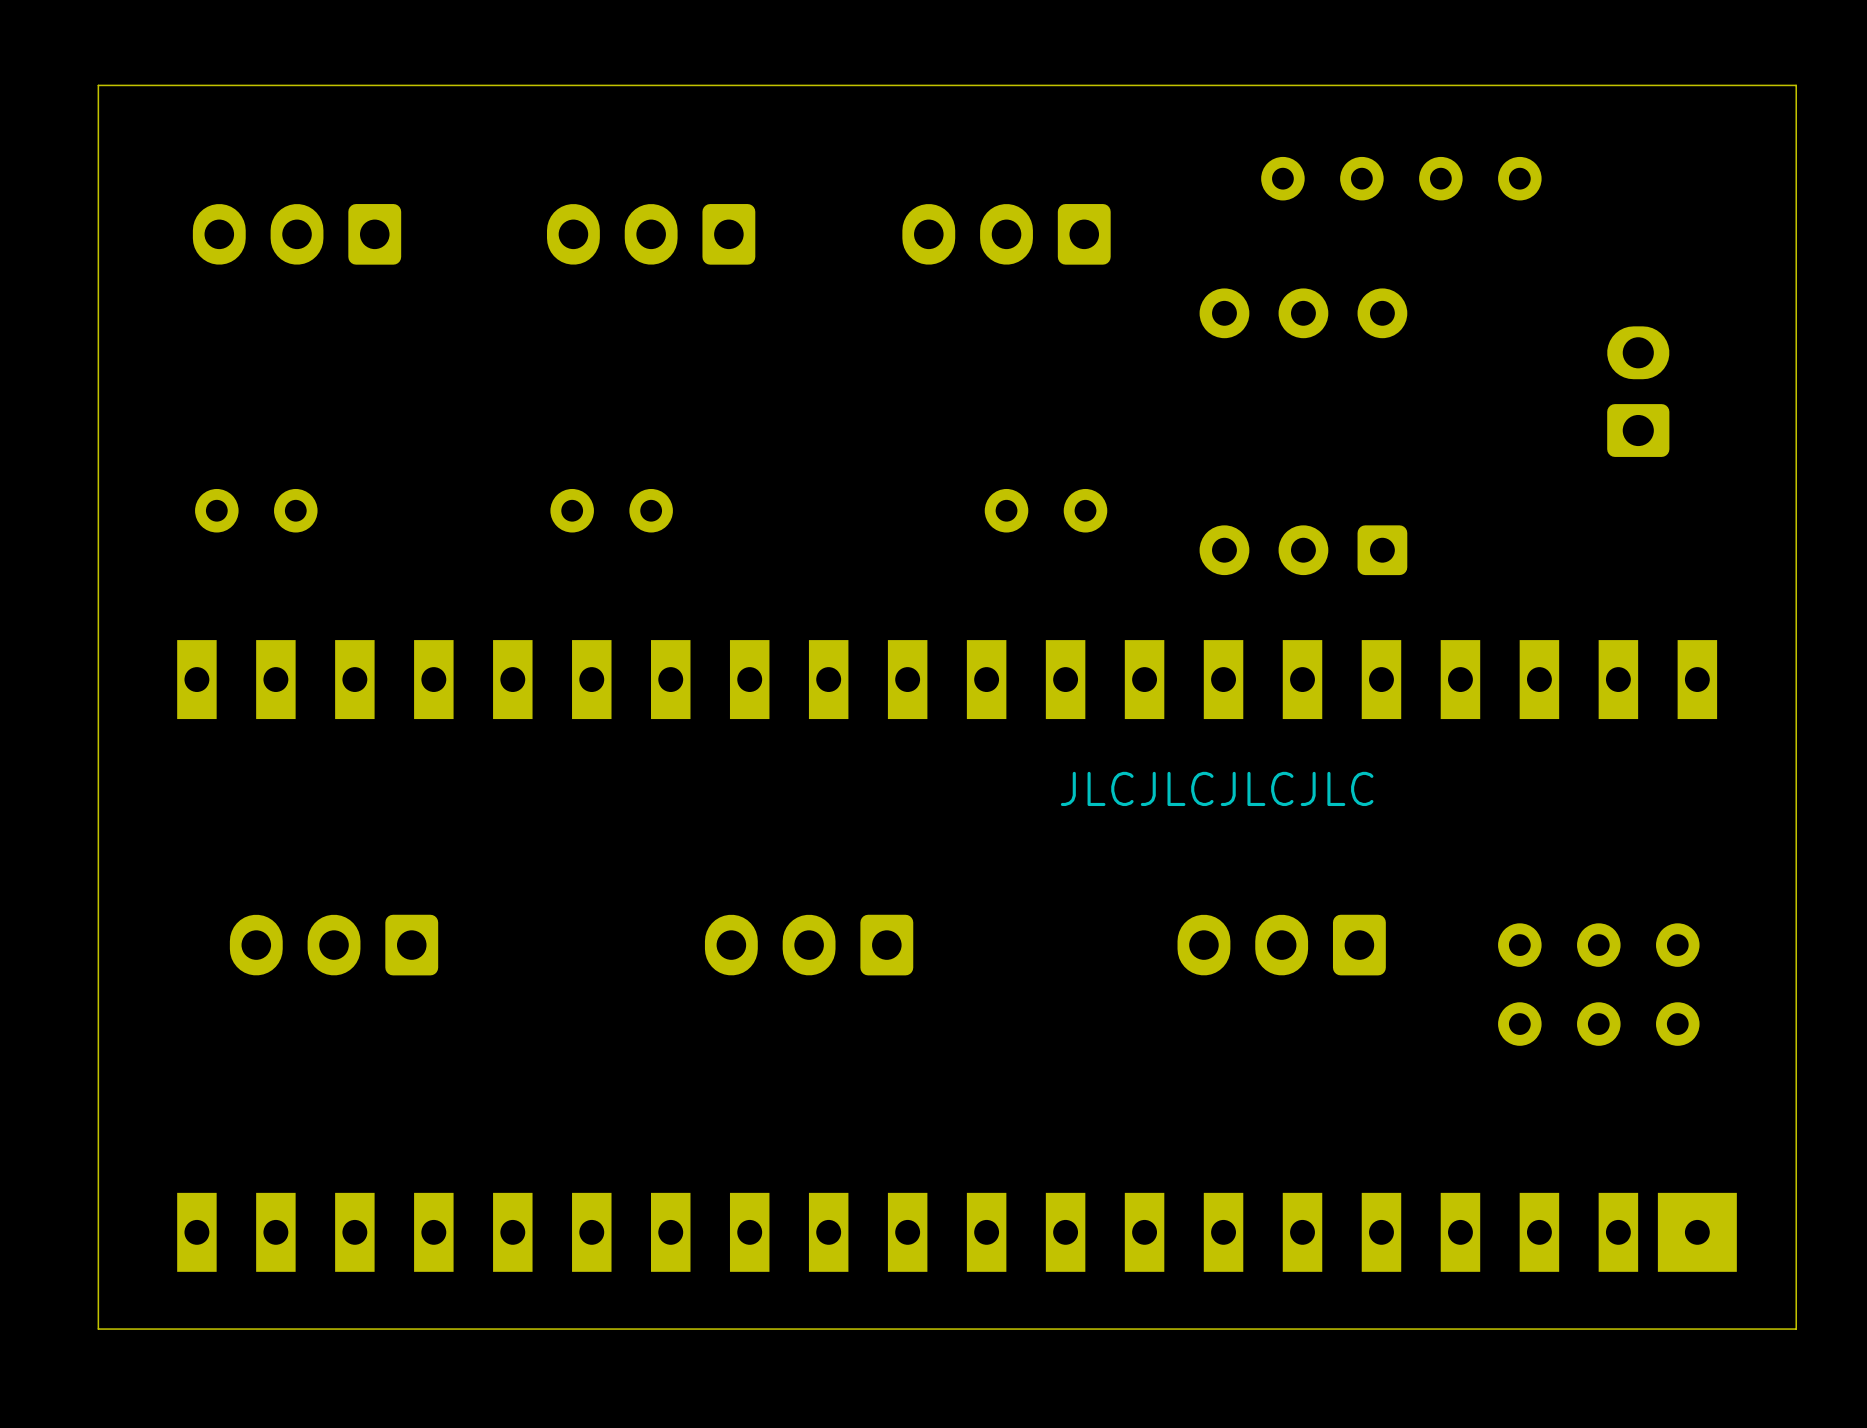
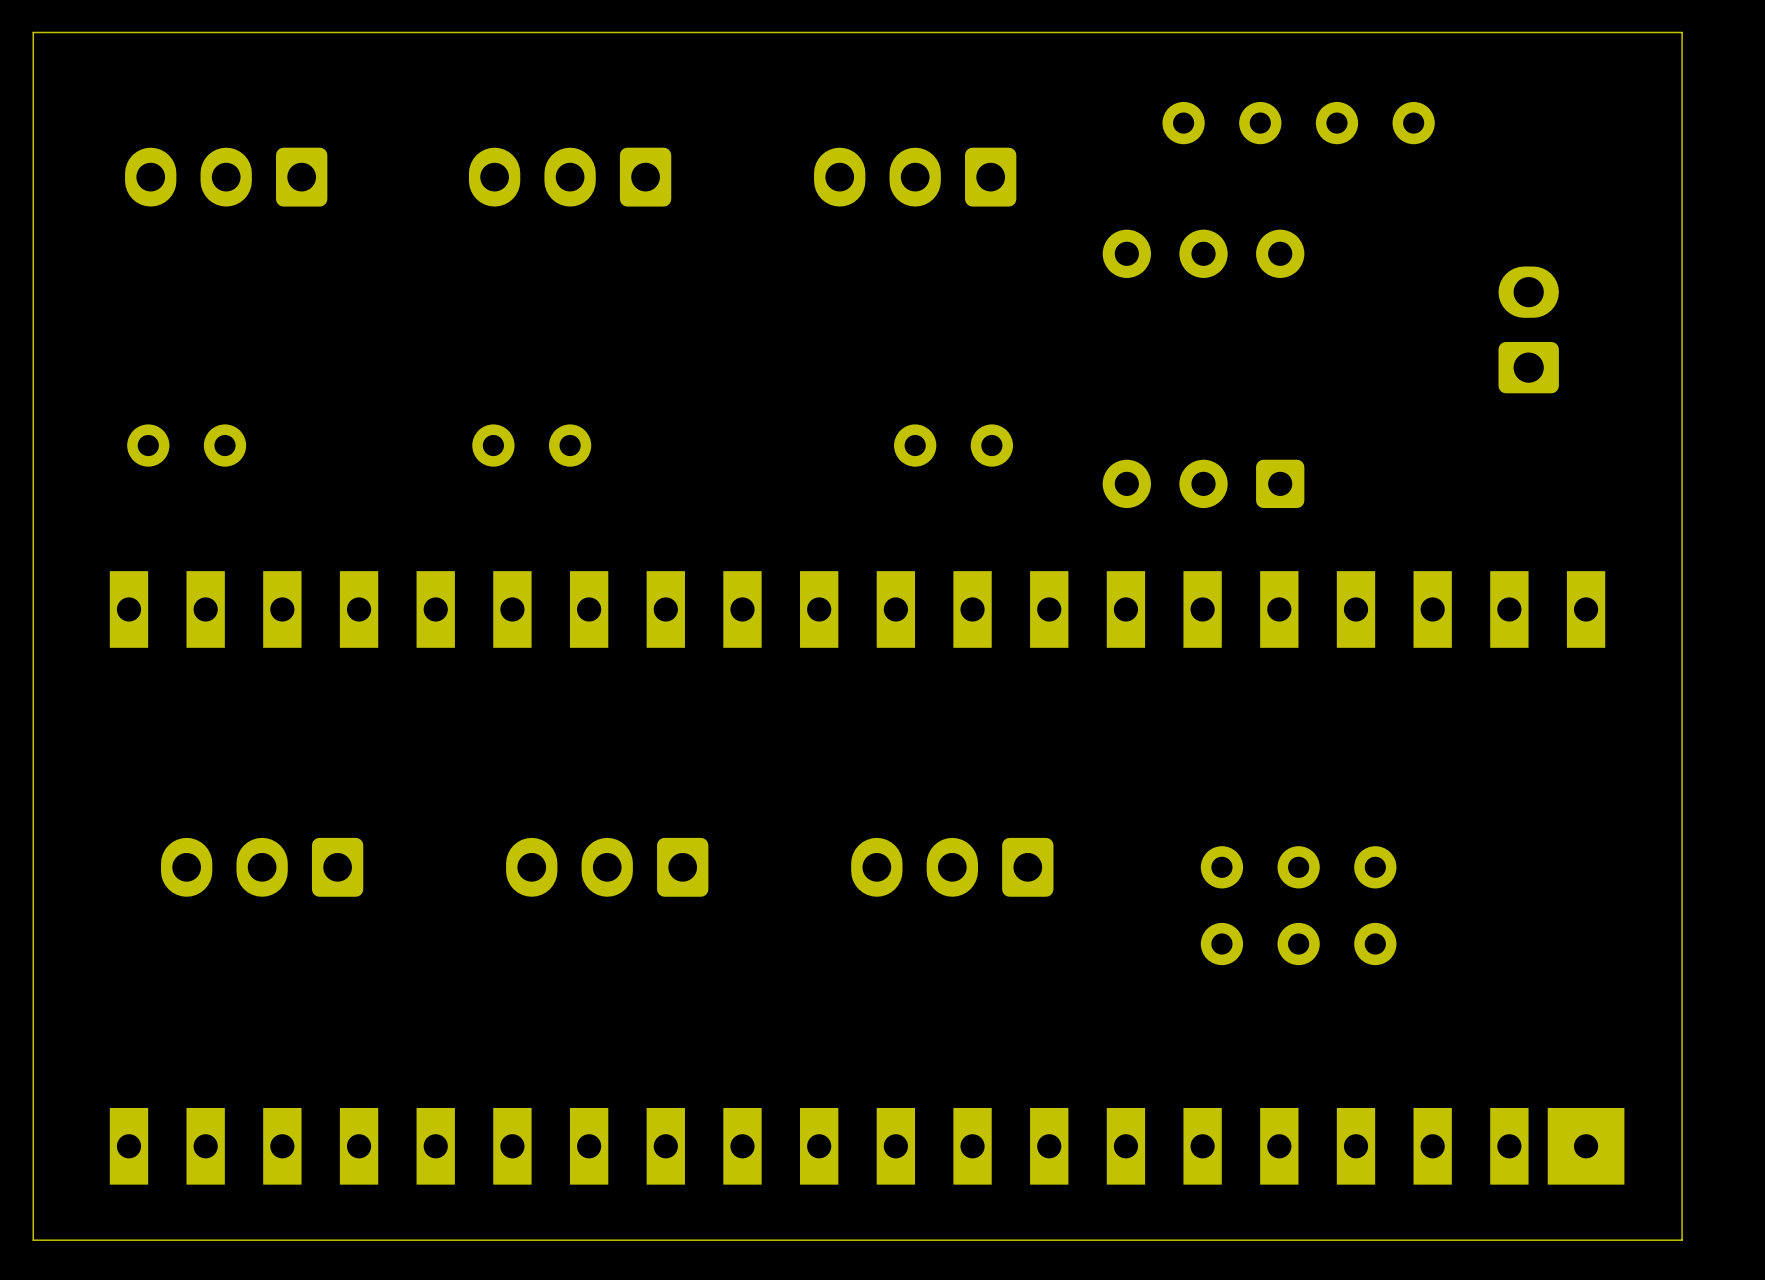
text: JLCJLCJLCJLC (1217, 788) -> none
part: none -> (607, 867)
part: (809, 945) -> none
part: none -> (952, 867)
part: (1281, 945) -> none
part: none -> (1221, 905)
part: none -> (1298, 905)
part position: (1519, 984) -> (1375, 905)
part: (1598, 984) -> none
part: (1677, 984) -> none

